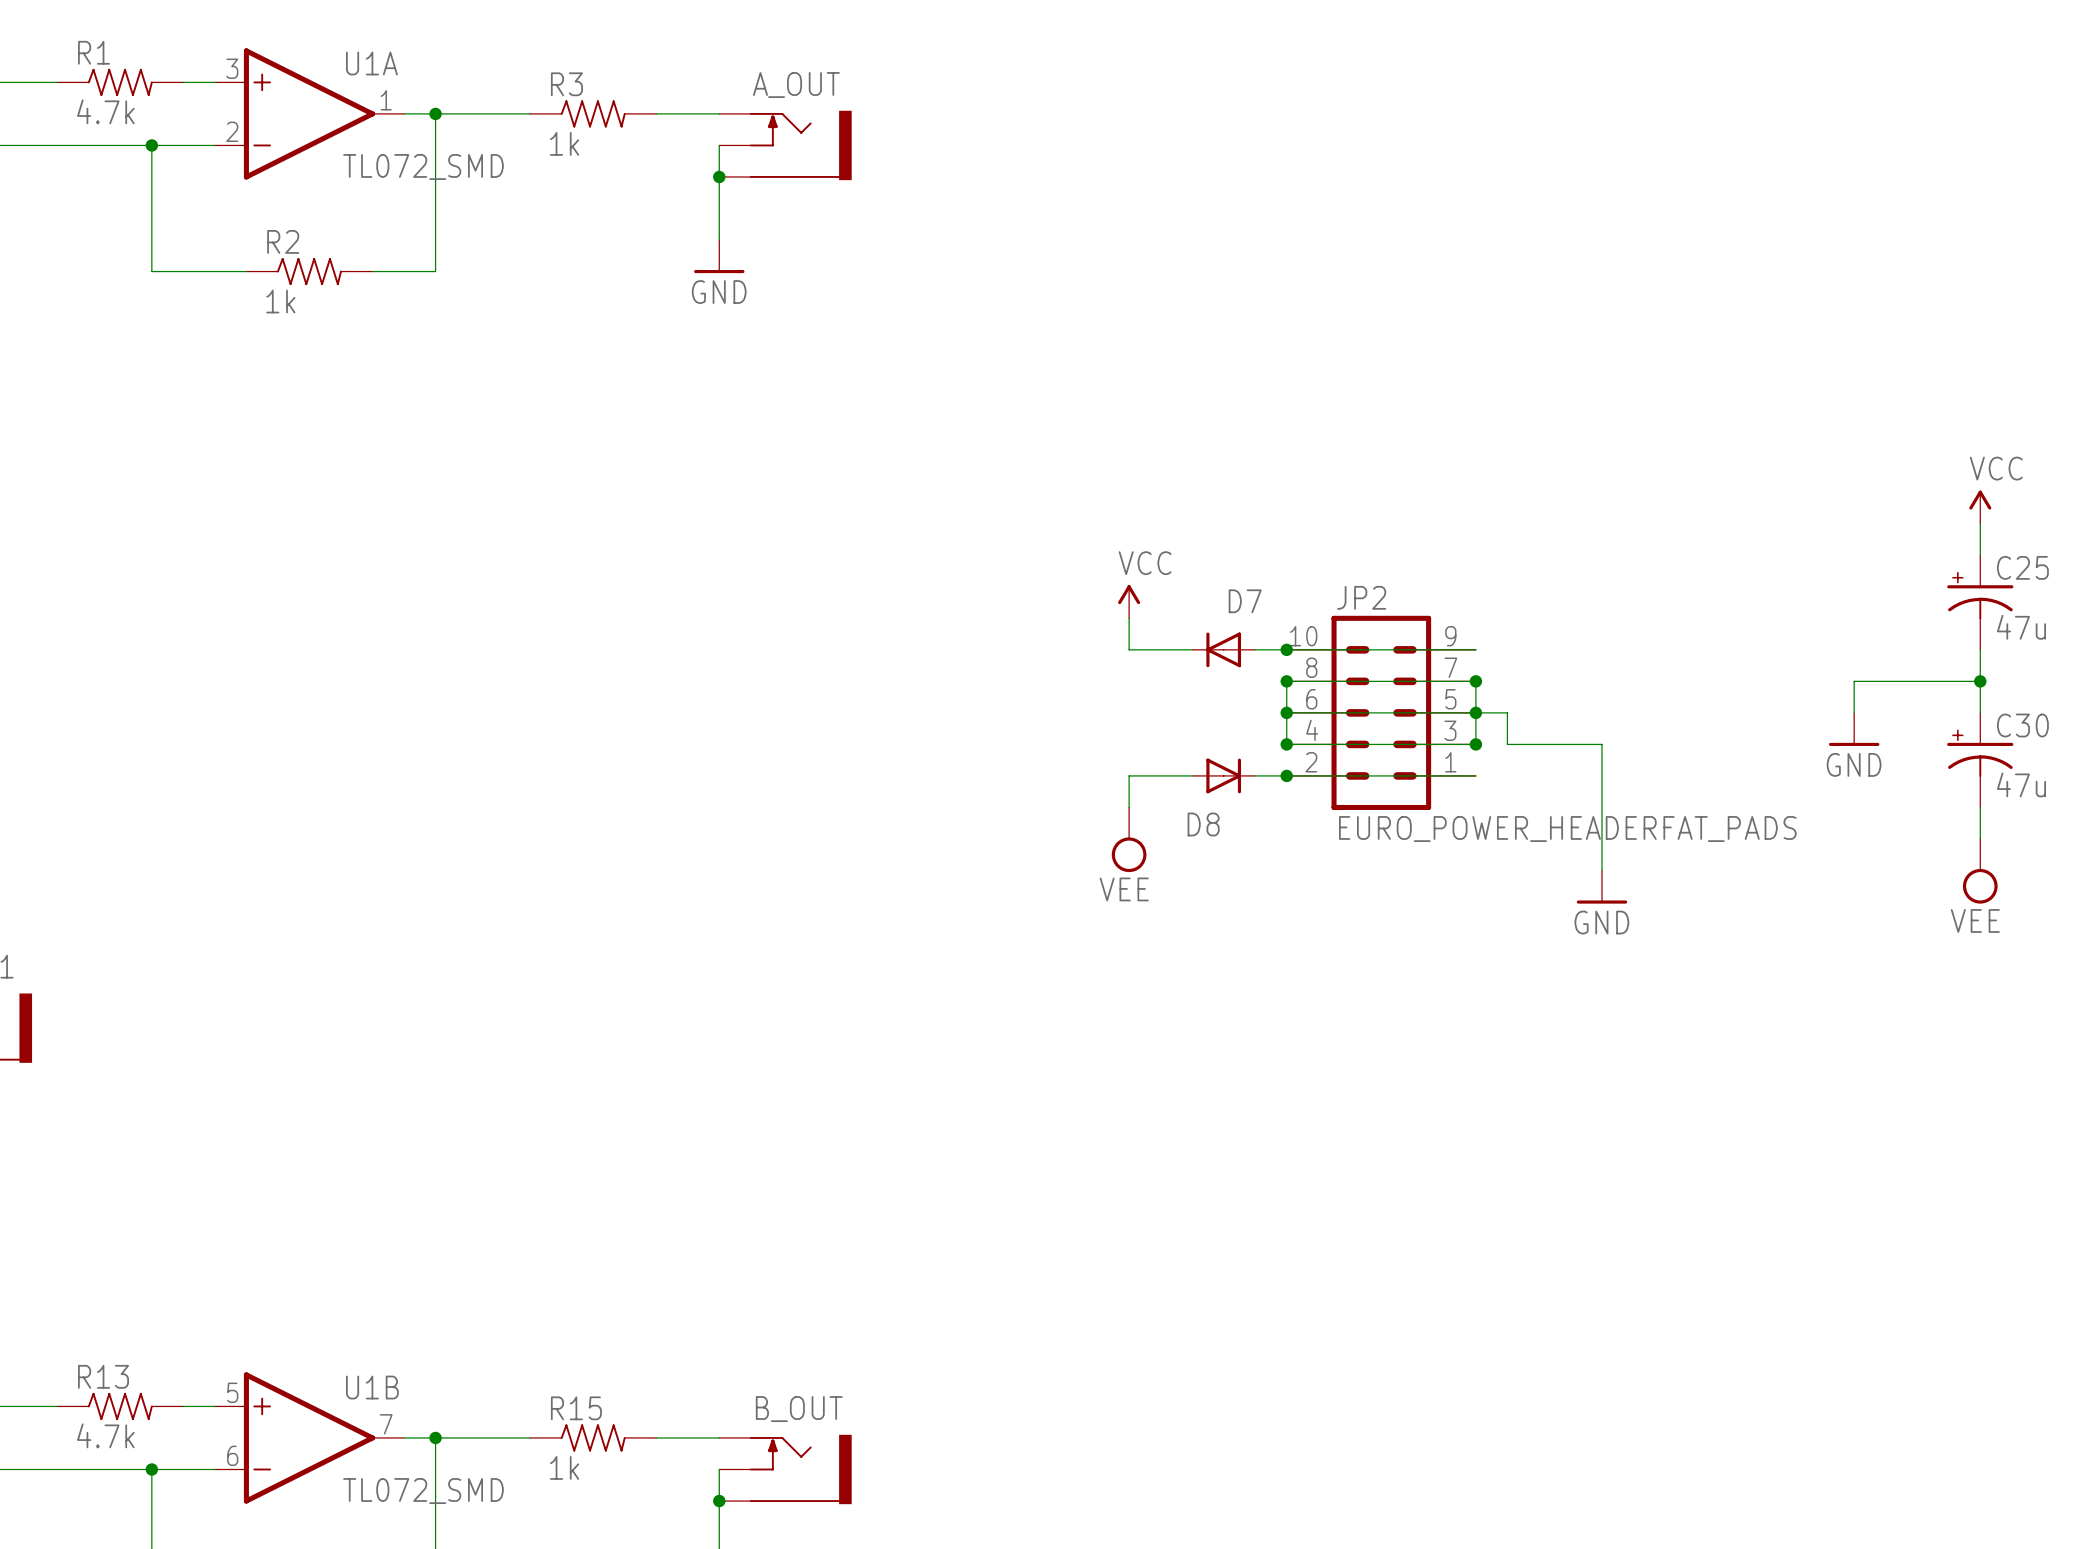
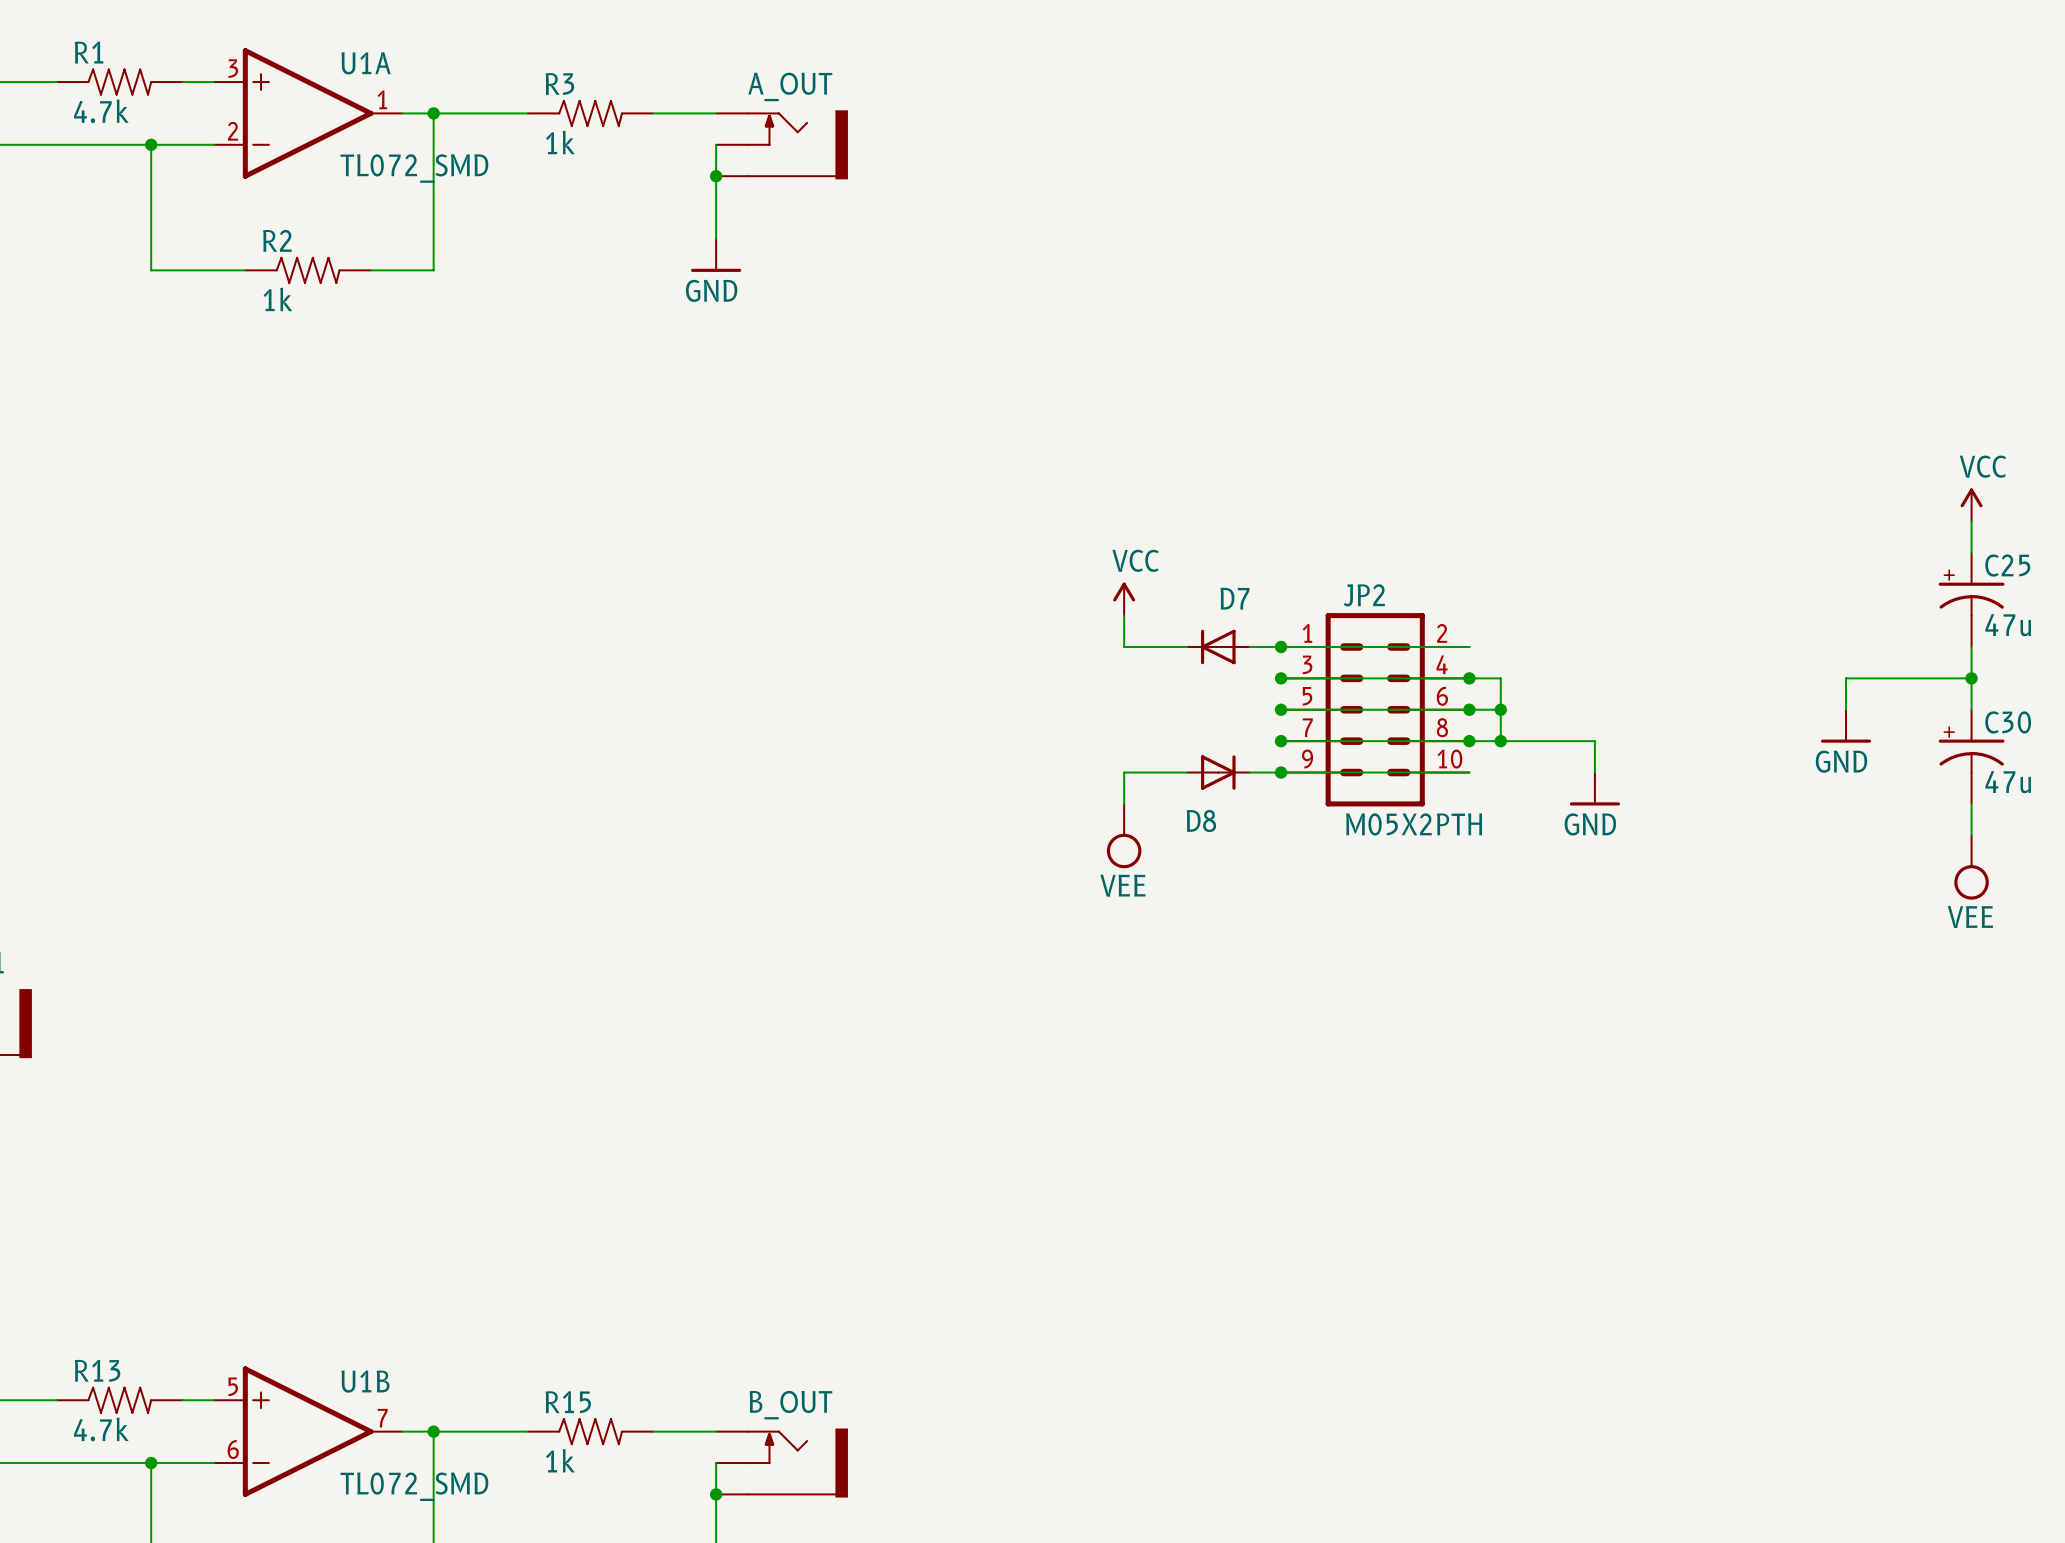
wire: (1286, 681) (1286, 744) -> none
wire: (1475, 681) (1475, 744) -> (1469, 678) (1500, 678) (1500, 709)
JP2 rotation: 0° (1381, 712) -> 180° (1375, 709)
junction: none -> (1500, 709)
wire: none -> (1469, 741) (1500, 741)
junction: none -> (1500, 741)
wire: (1601, 775) (1601, 870) -> none
JP2 value: EURO_POWER_HEADERFAT_PADS (1567, 829) -> M05X2PTH (1414, 824)
power symbol position: GND (1601, 887) -> GND (1594, 789)

